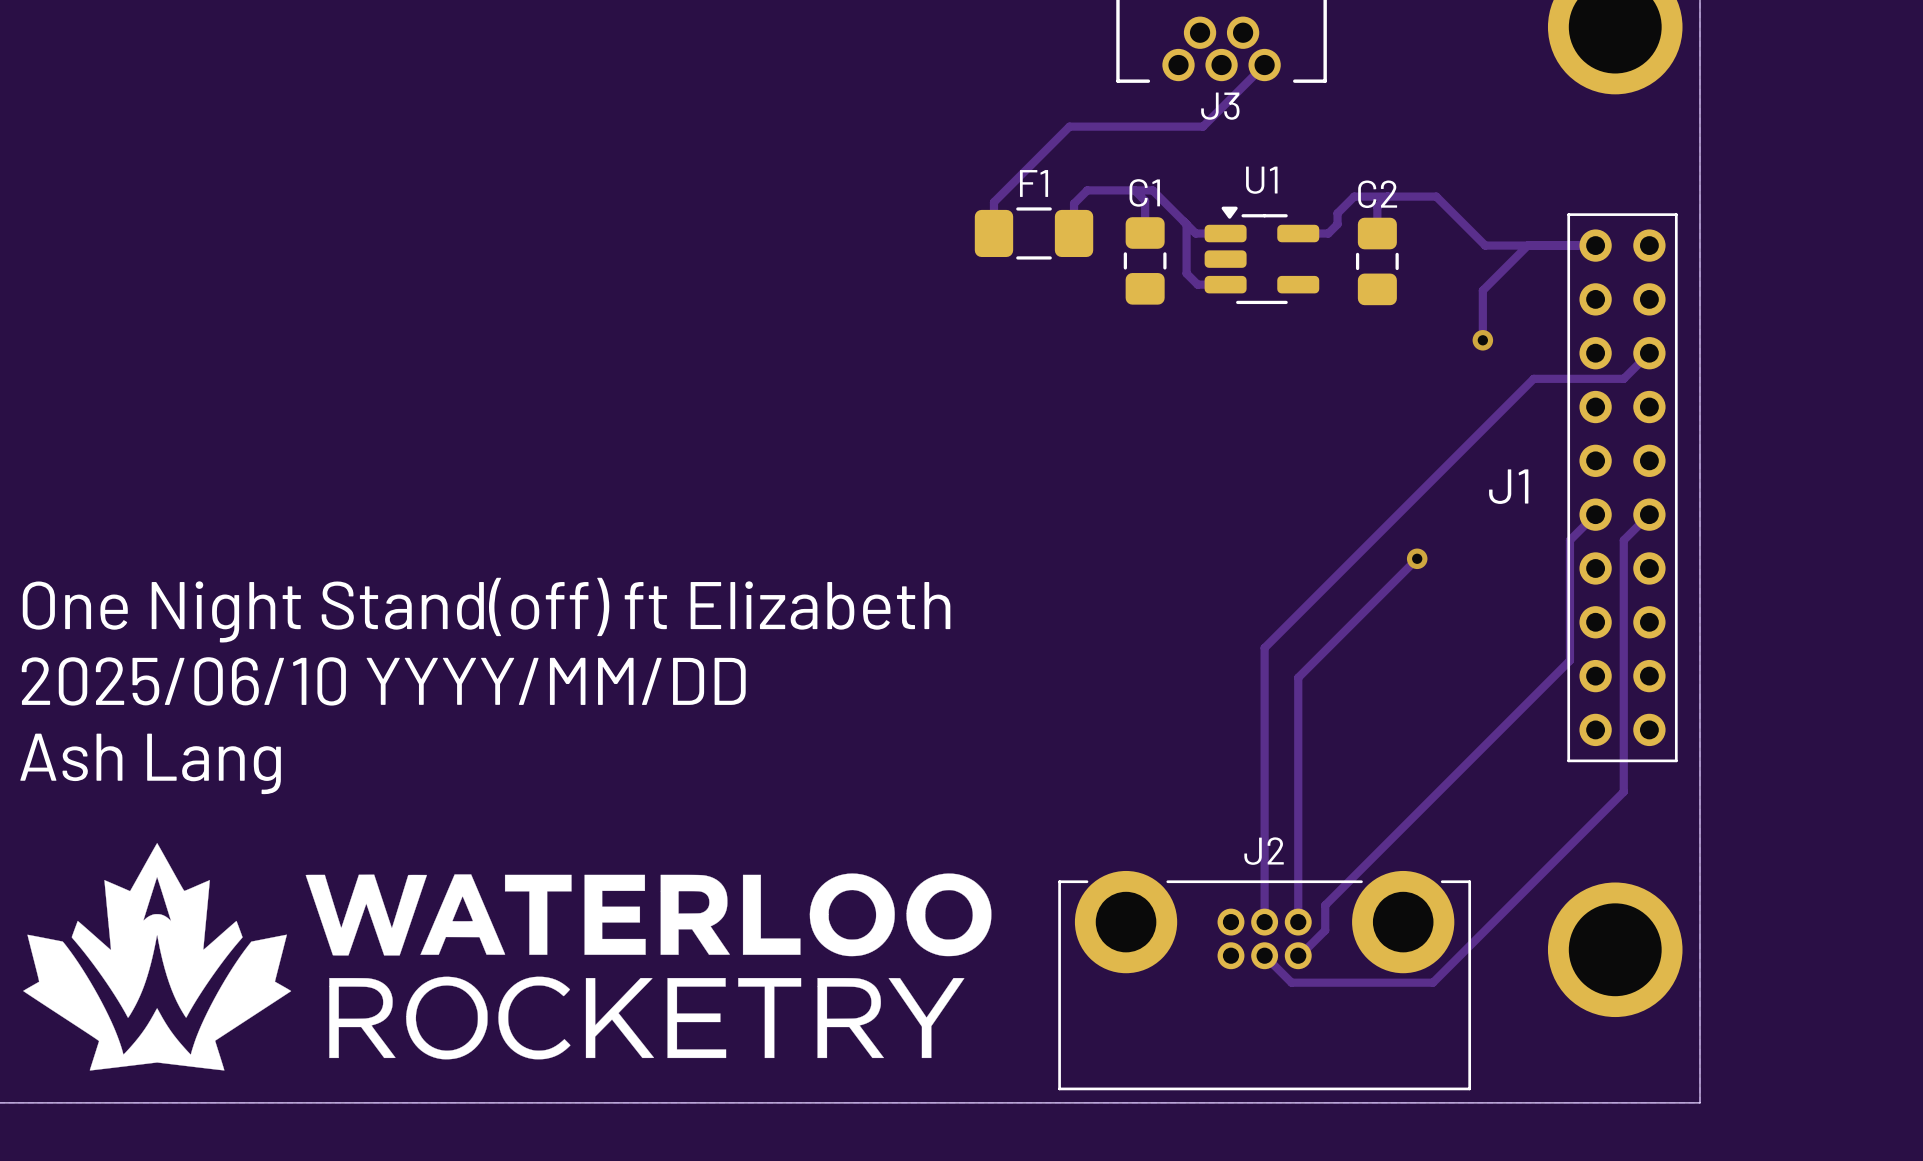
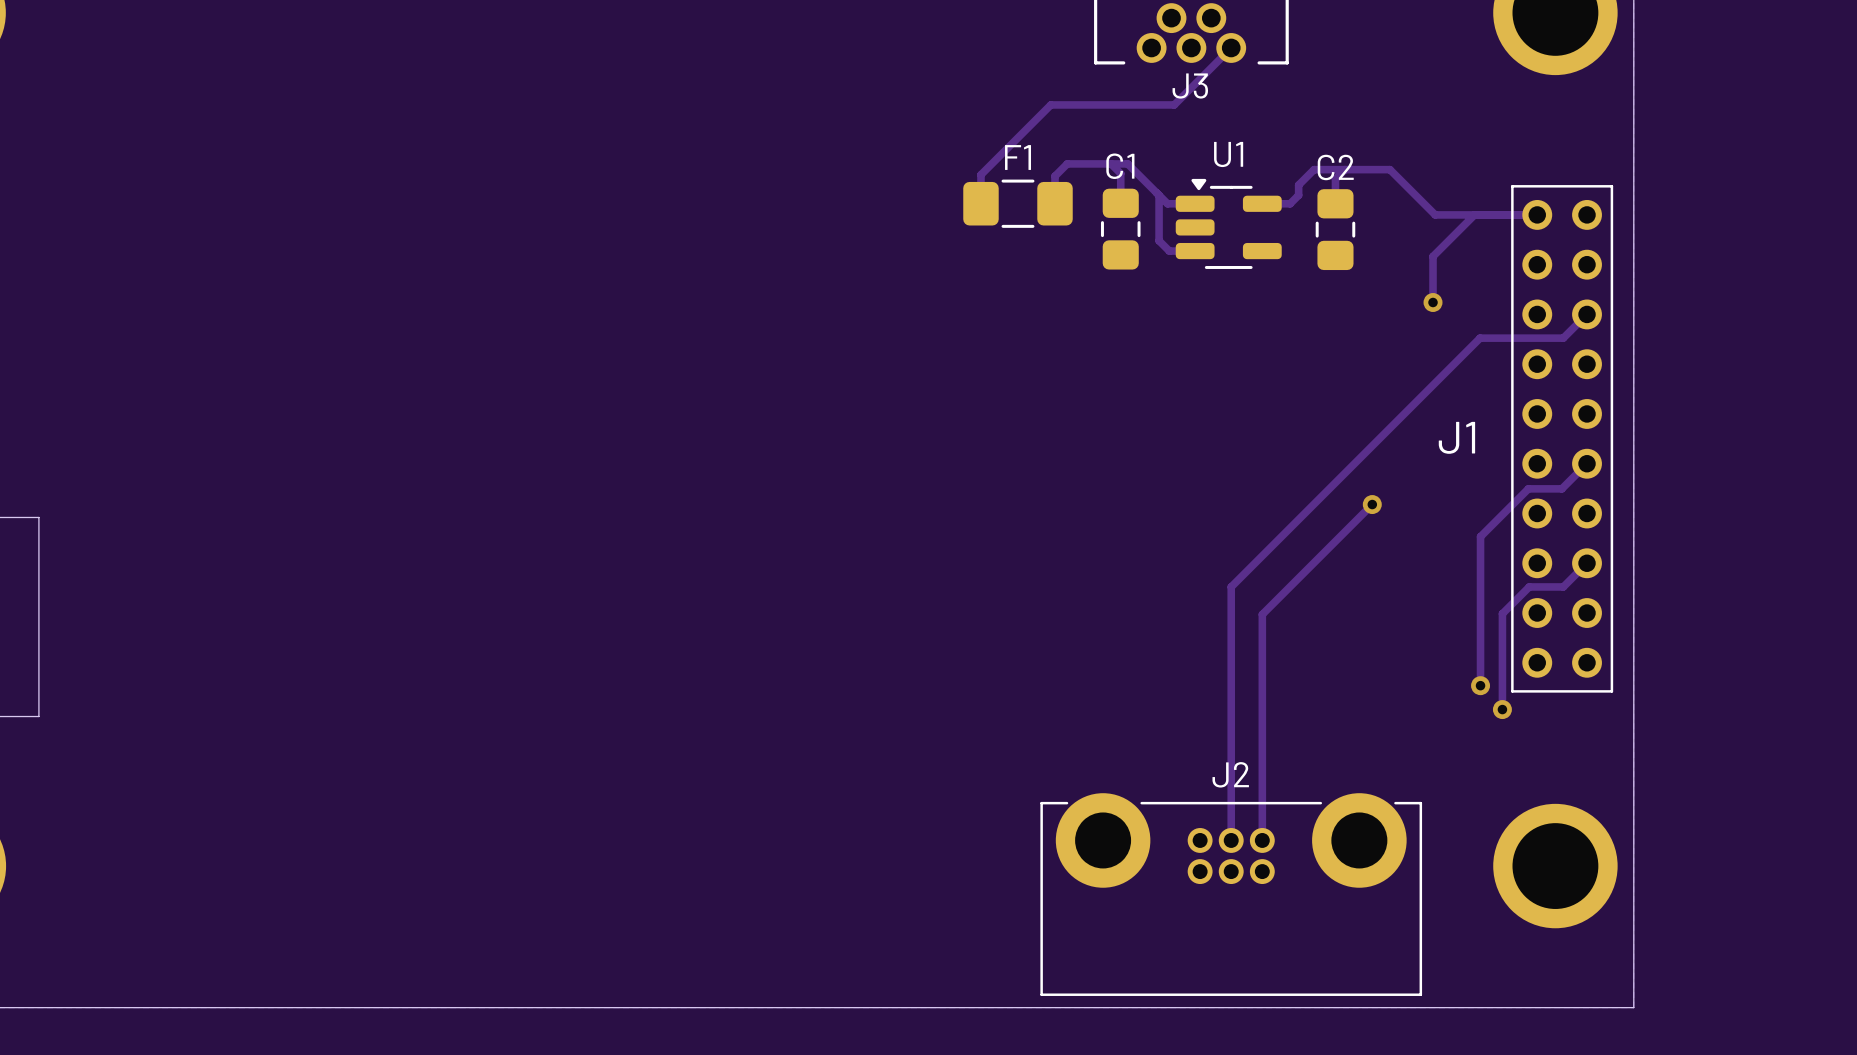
track: (1595, 514) (1569, 540) (1569, 660) (1325, 905) (1325, 930) (1298, 955) -> none
track: (1623, 540) (1623, 791) (1432, 982) (1291, 982) (1264, 955) -> (1563, 487) (1528, 488) (1480, 536) (1480, 685)
text: One Night Stand(off) ft Elizabeth (486, 610) -> none
track: none -> (1587, 563) (1563, 586) (1529, 586) (1502, 613) (1502, 709)
text: 2025/06/10 YYYY/MM/DD (383, 681) -> none
via: none -> (1480, 685)
text: Ash Lang (150, 763) -> none
via: none -> (1502, 709)
drawing: [23, 843, 992, 1071] -> none

